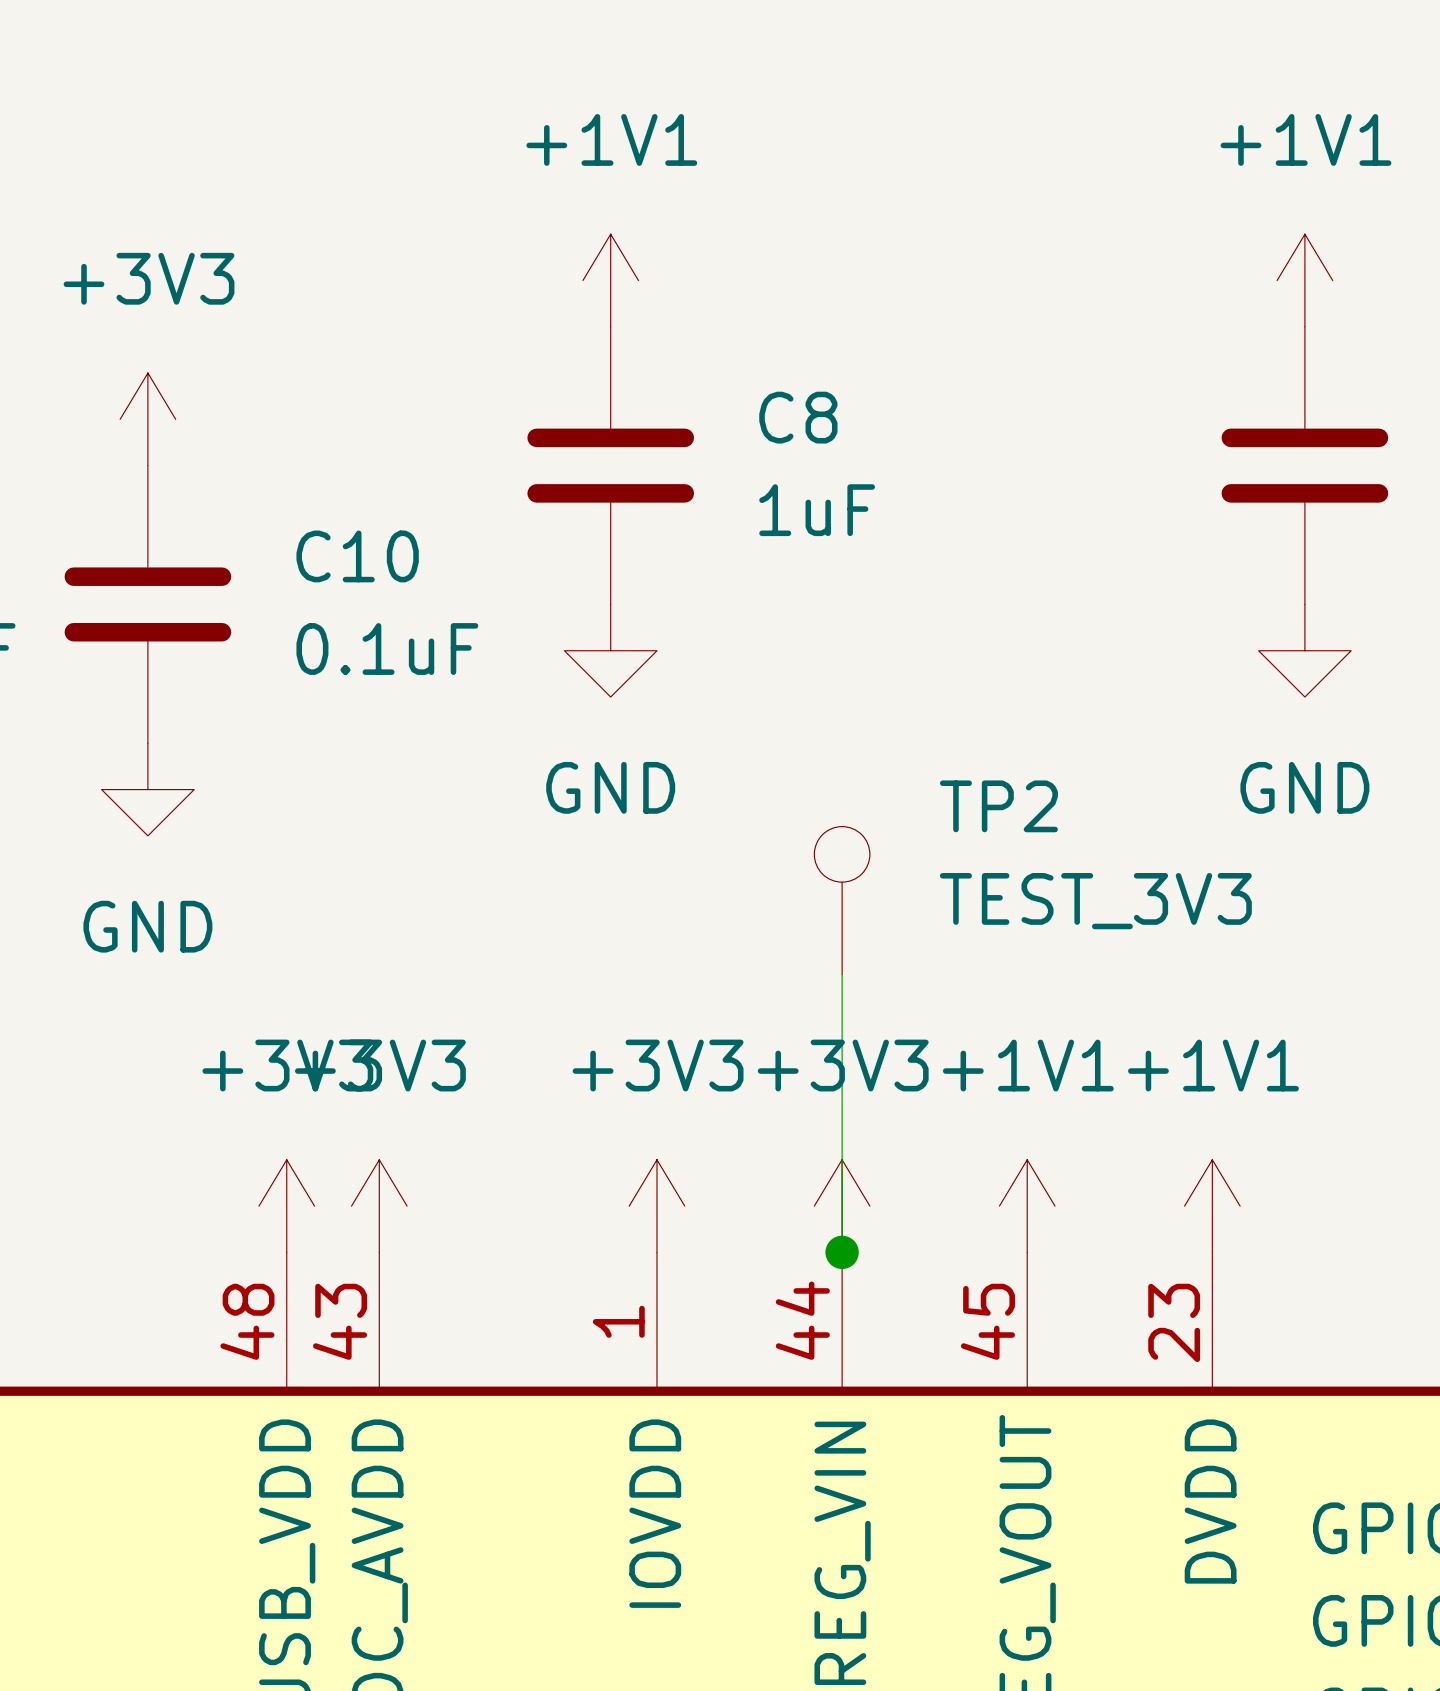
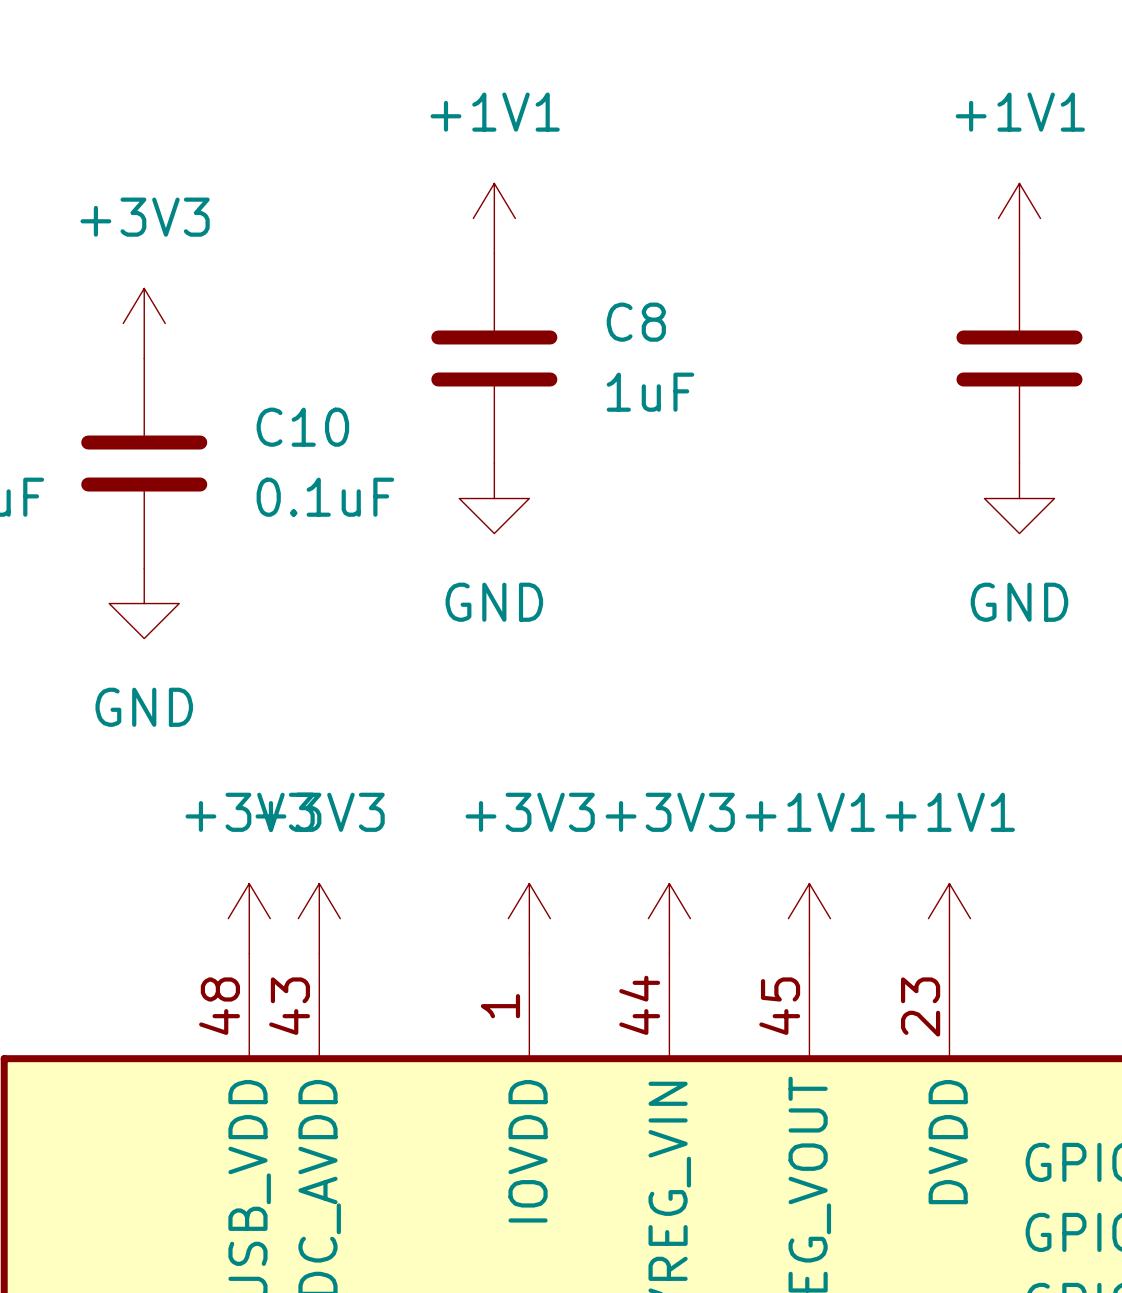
TP2: TEST_3V3 (842, 900) -> none
wire: (842, 974) (842, 1252) -> none
junction: (842, 1252) -> none

